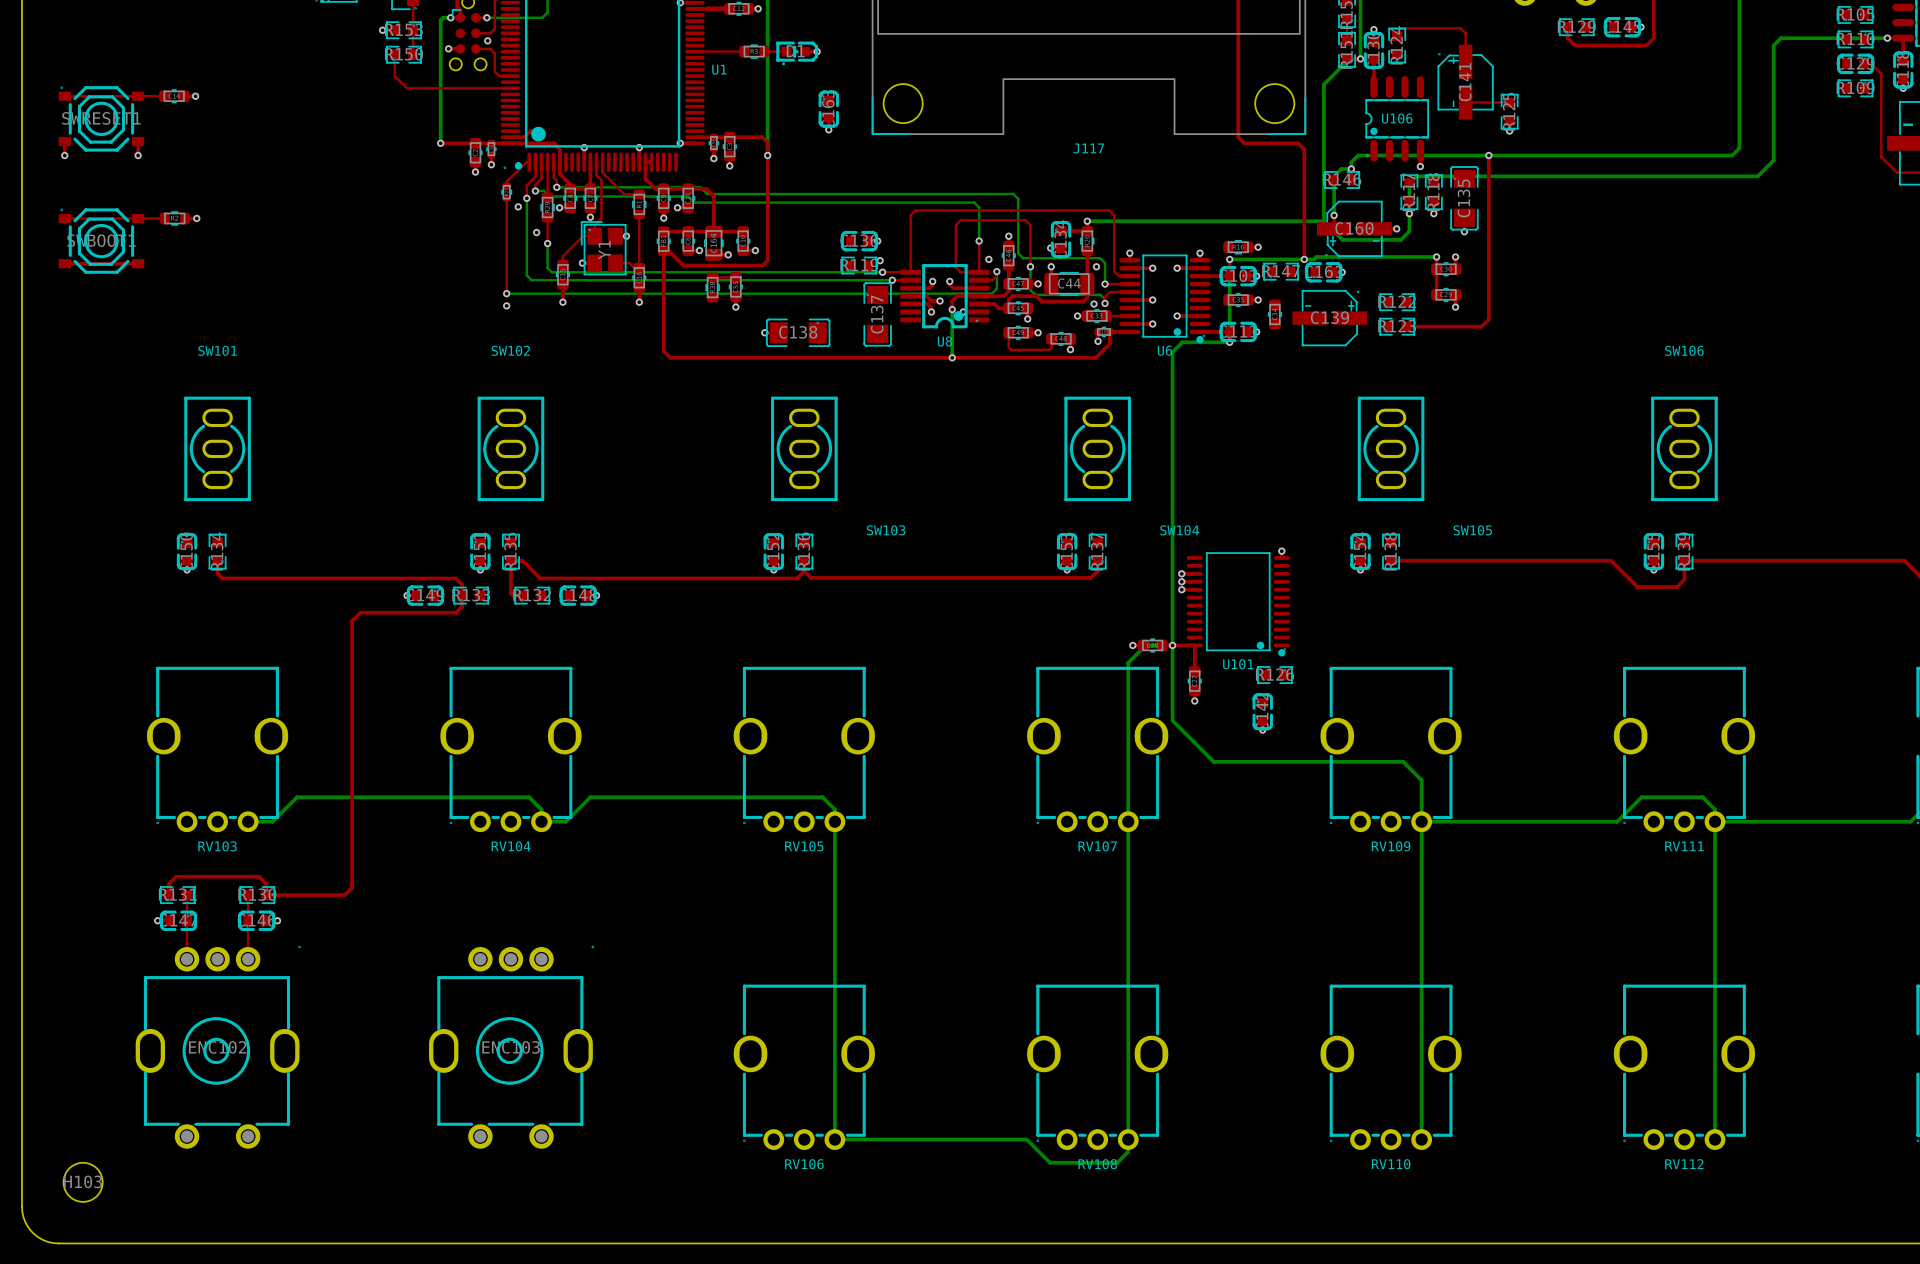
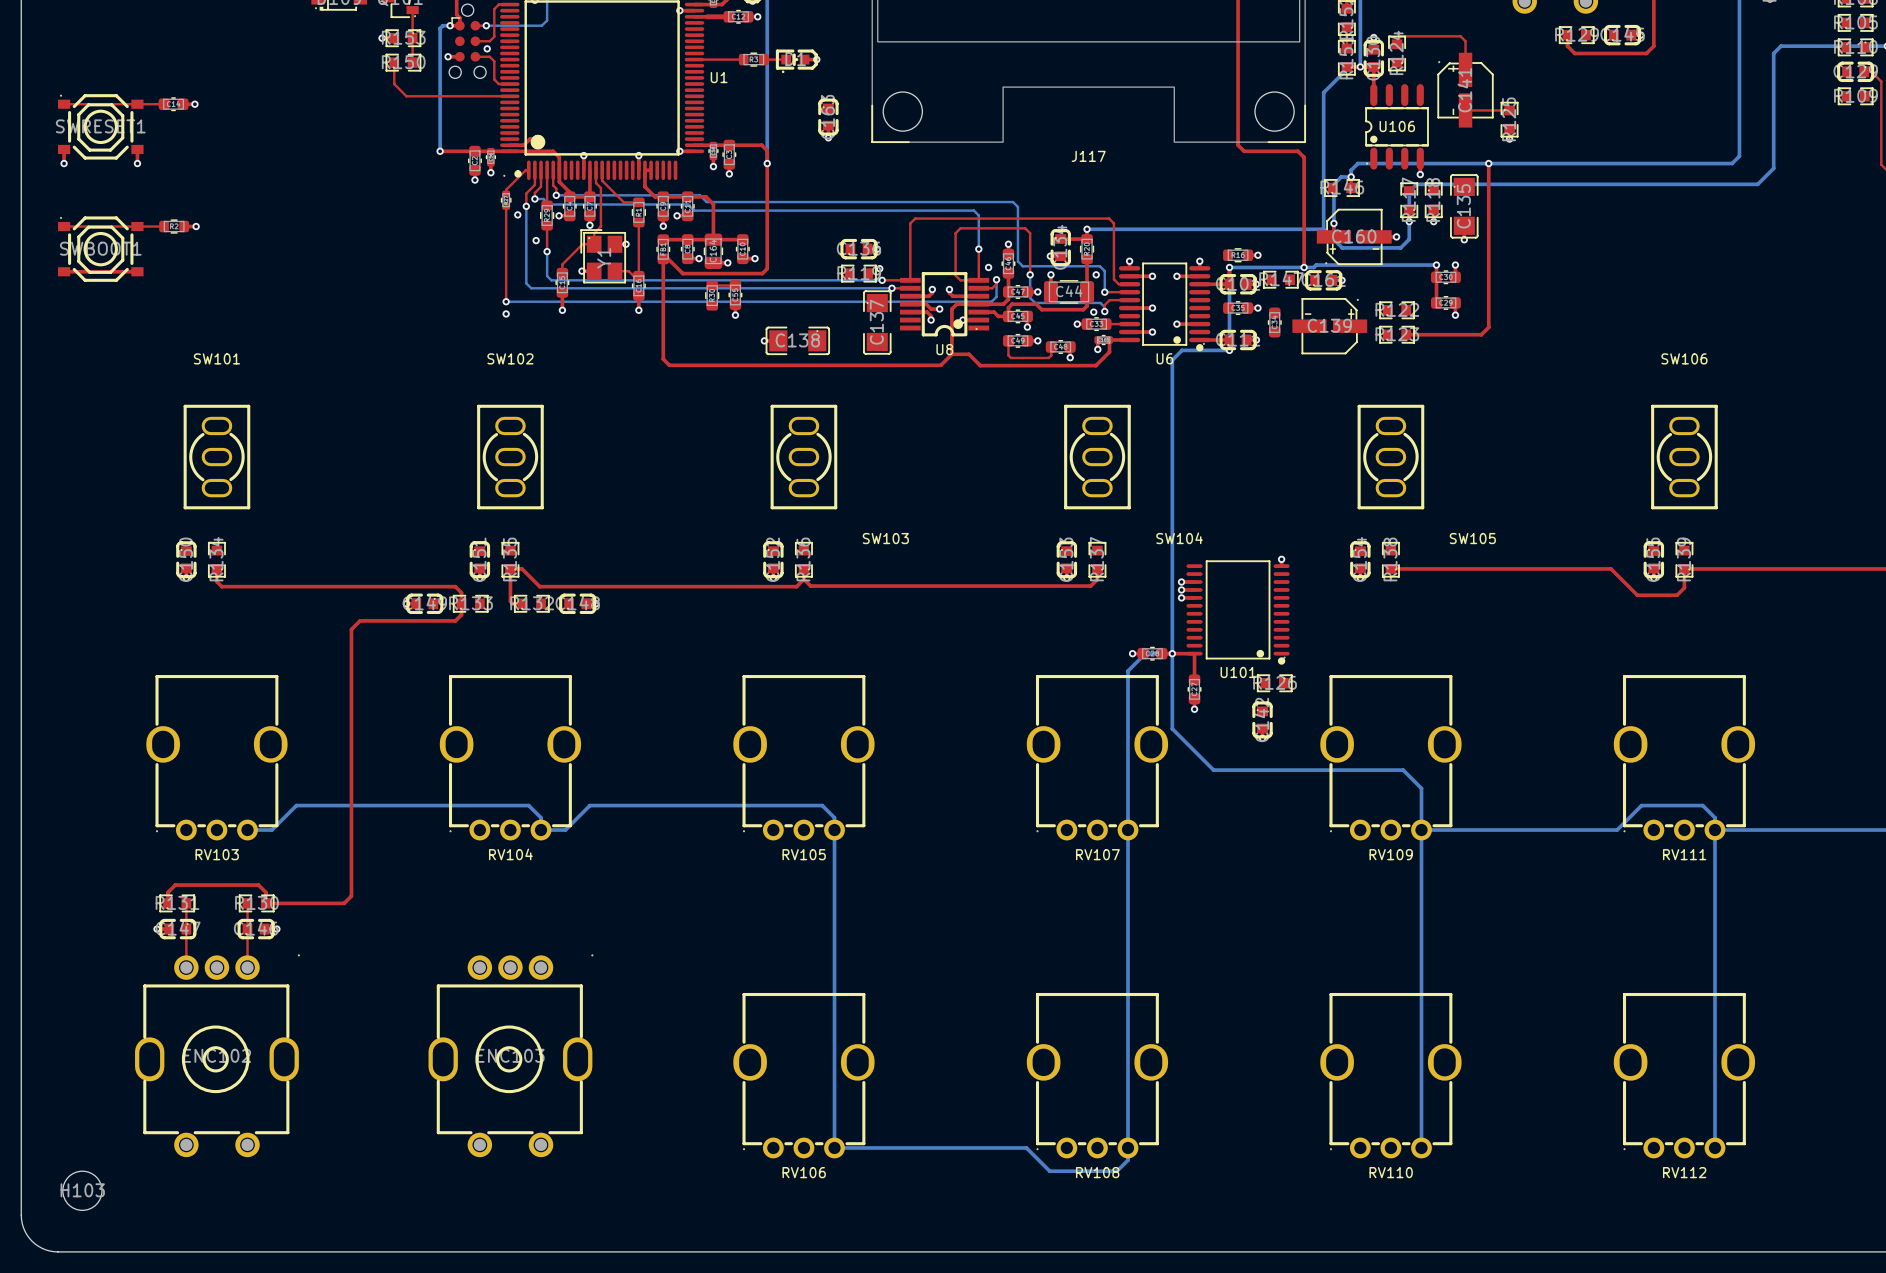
top track: none -> (951, 317) (951, 354)
bottom track: (952, 309) (952, 357) -> none
via: (952, 309) -> none
top track: none -> (951, 354) (969, 354) (980, 365) (1095, 365)
top track: (669, 357) (1096, 357) -> (669, 365) (940, 365) (951, 354)
via: (952, 357) -> none

